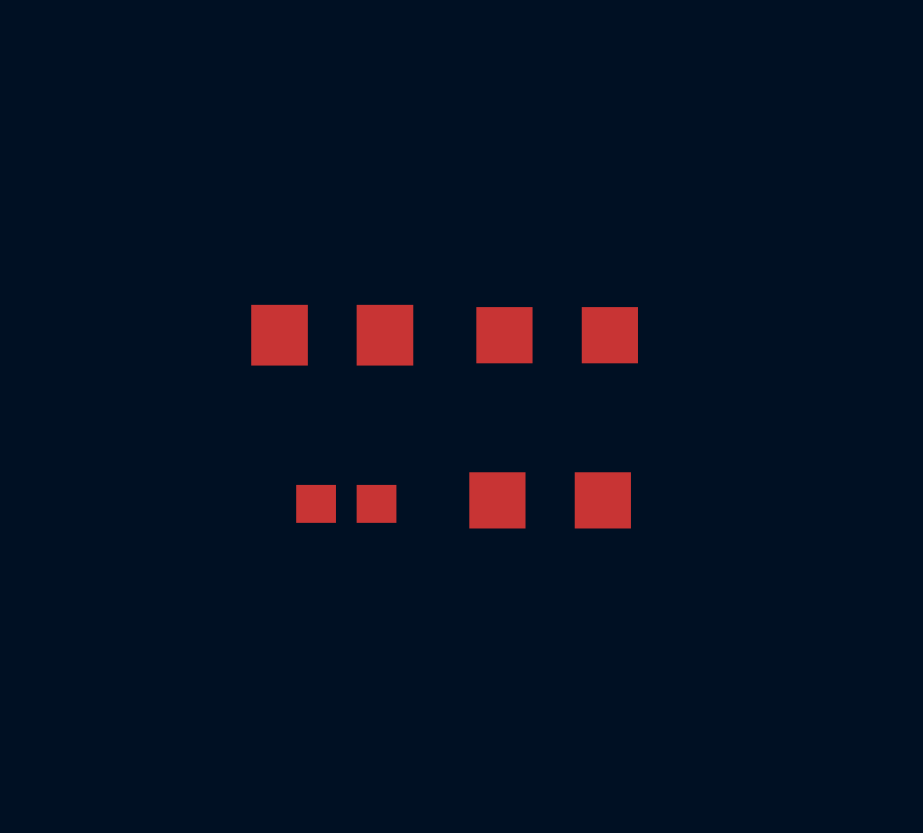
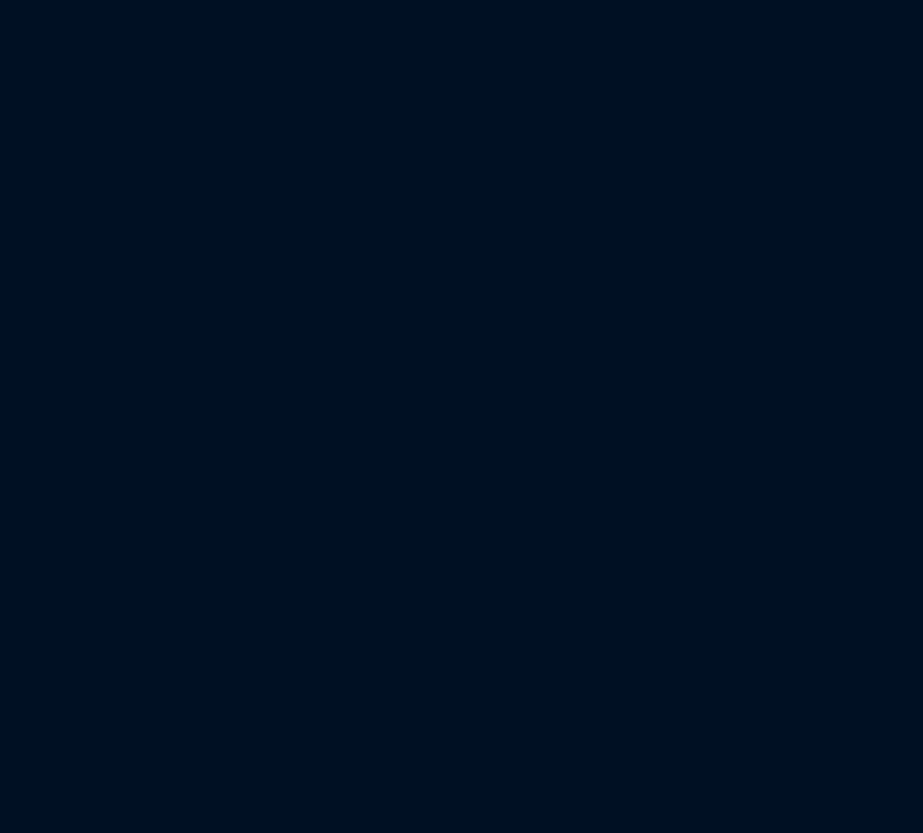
part: (332, 335) -> none
part: (557, 335) -> none
part: (550, 500) -> none
part: (346, 503) -> none

